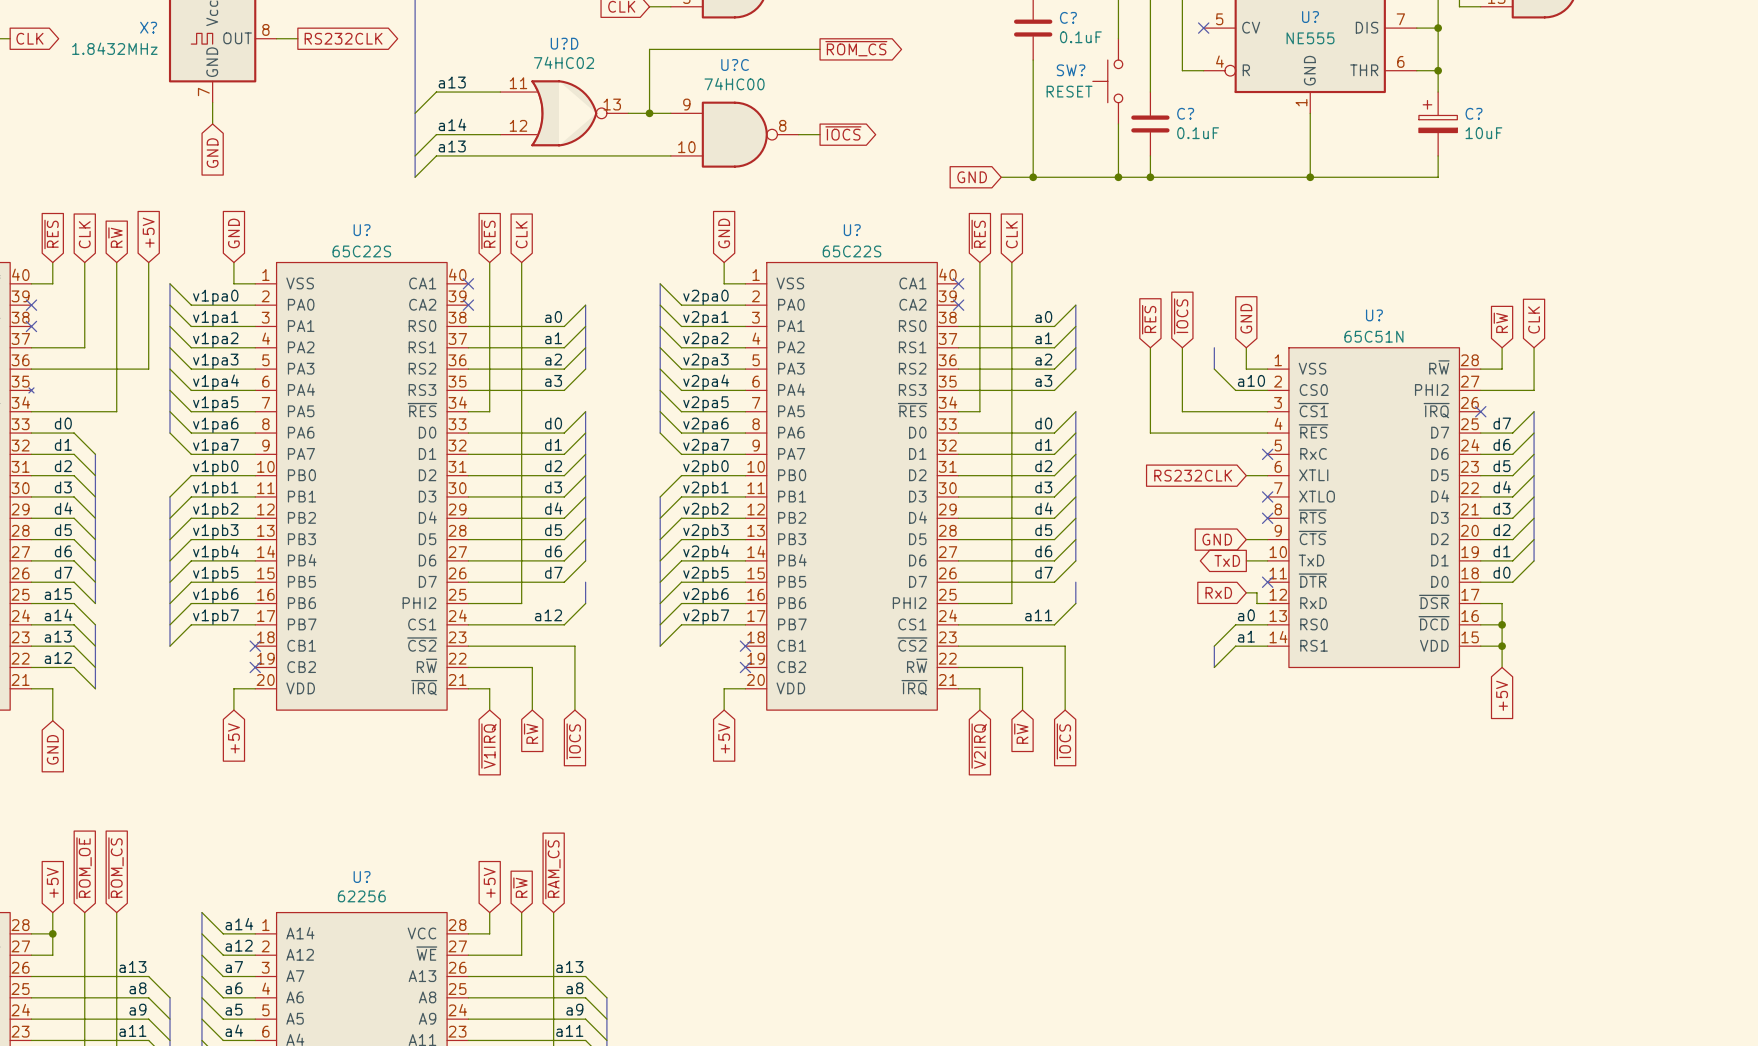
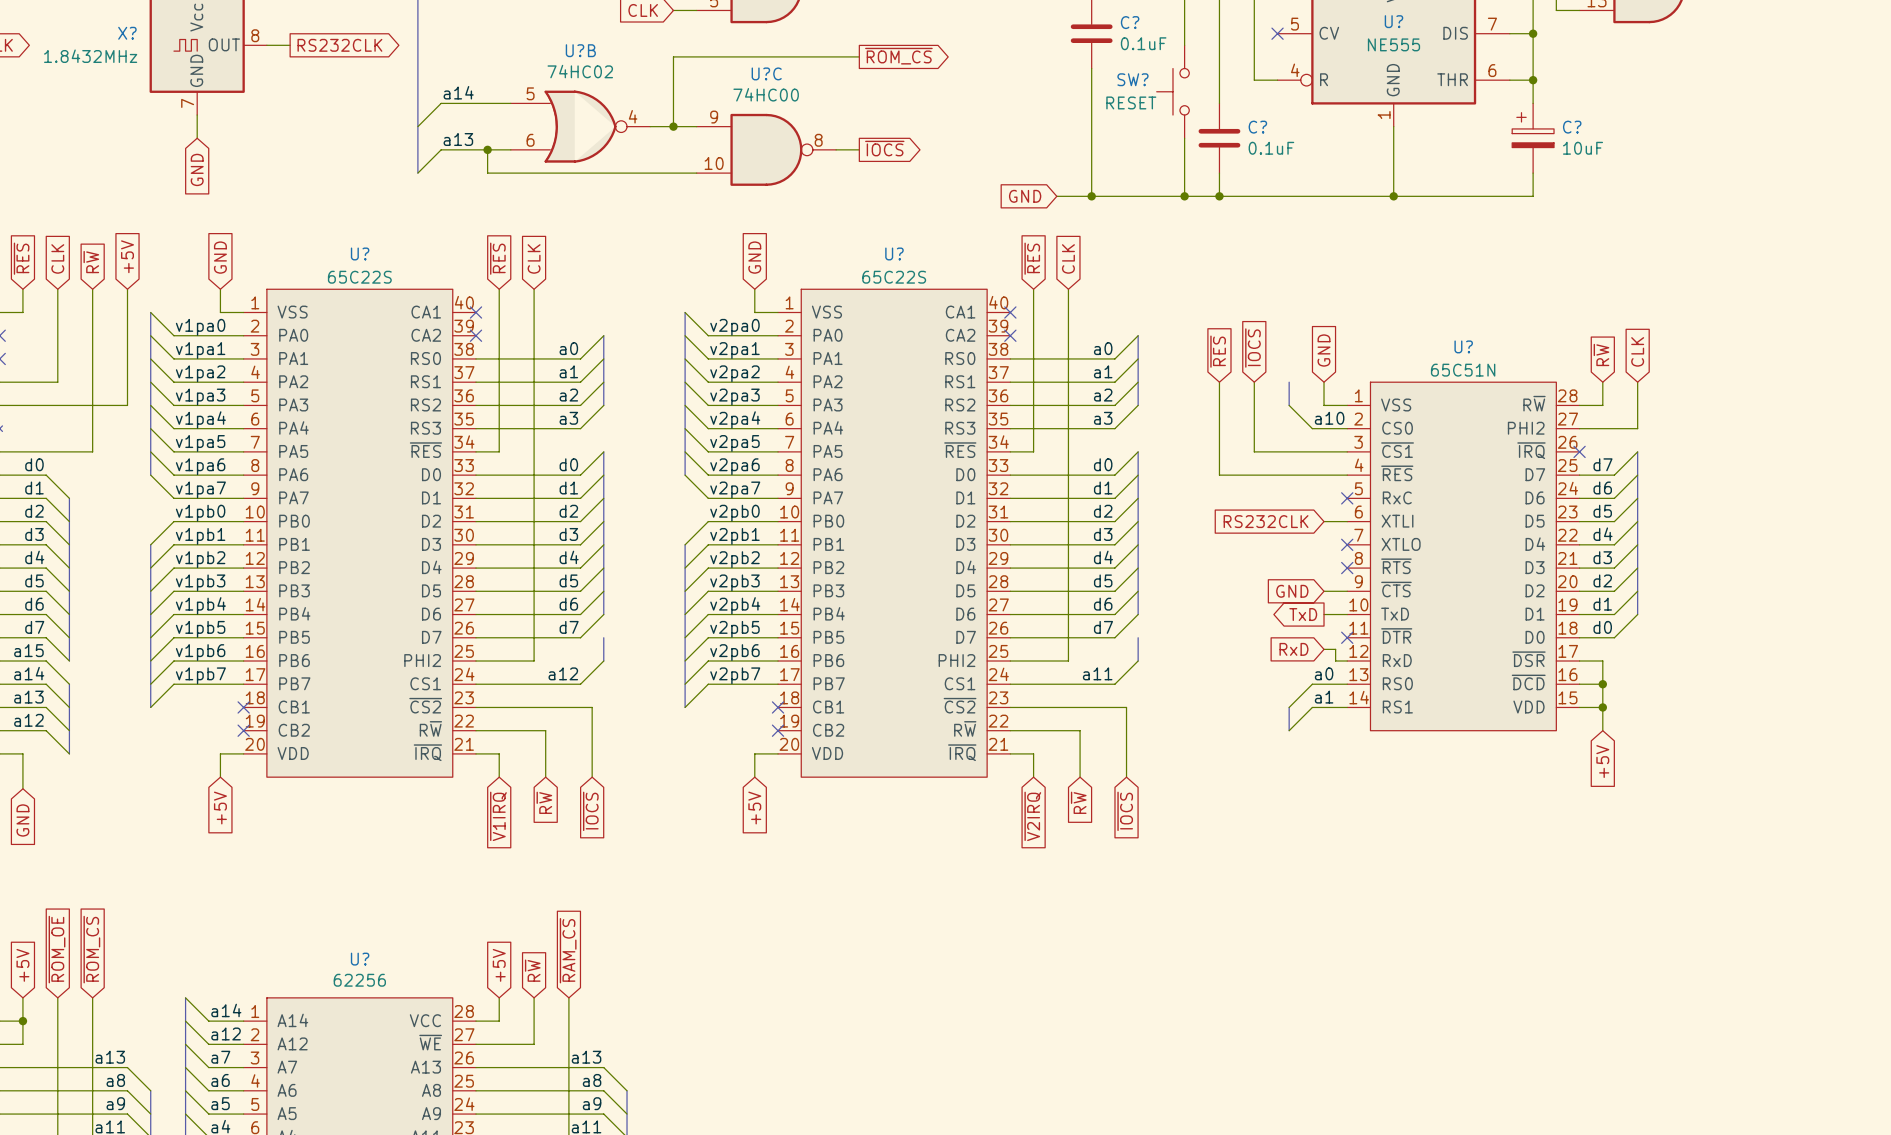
U?D name: U?D (564, 43) -> U?B (580, 50)
label: a13 (452, 82) -> a14 (458, 92)
U?D pin number: 11 (518, 83) -> 5 (530, 93)
U?D pin number: 13 (612, 104) -> 4 (633, 116)
label: a14 (452, 124) -> a13 (458, 139)
U?D pin number: 12 (518, 125) -> 6 (530, 140)
junction: none -> (487, 149)
label: a13 (452, 146) -> none
bus: (415, 155) (415, 177) -> none
wire: (479, 155) (436, 155) (415, 177) -> (487, 173) (487, 149)

